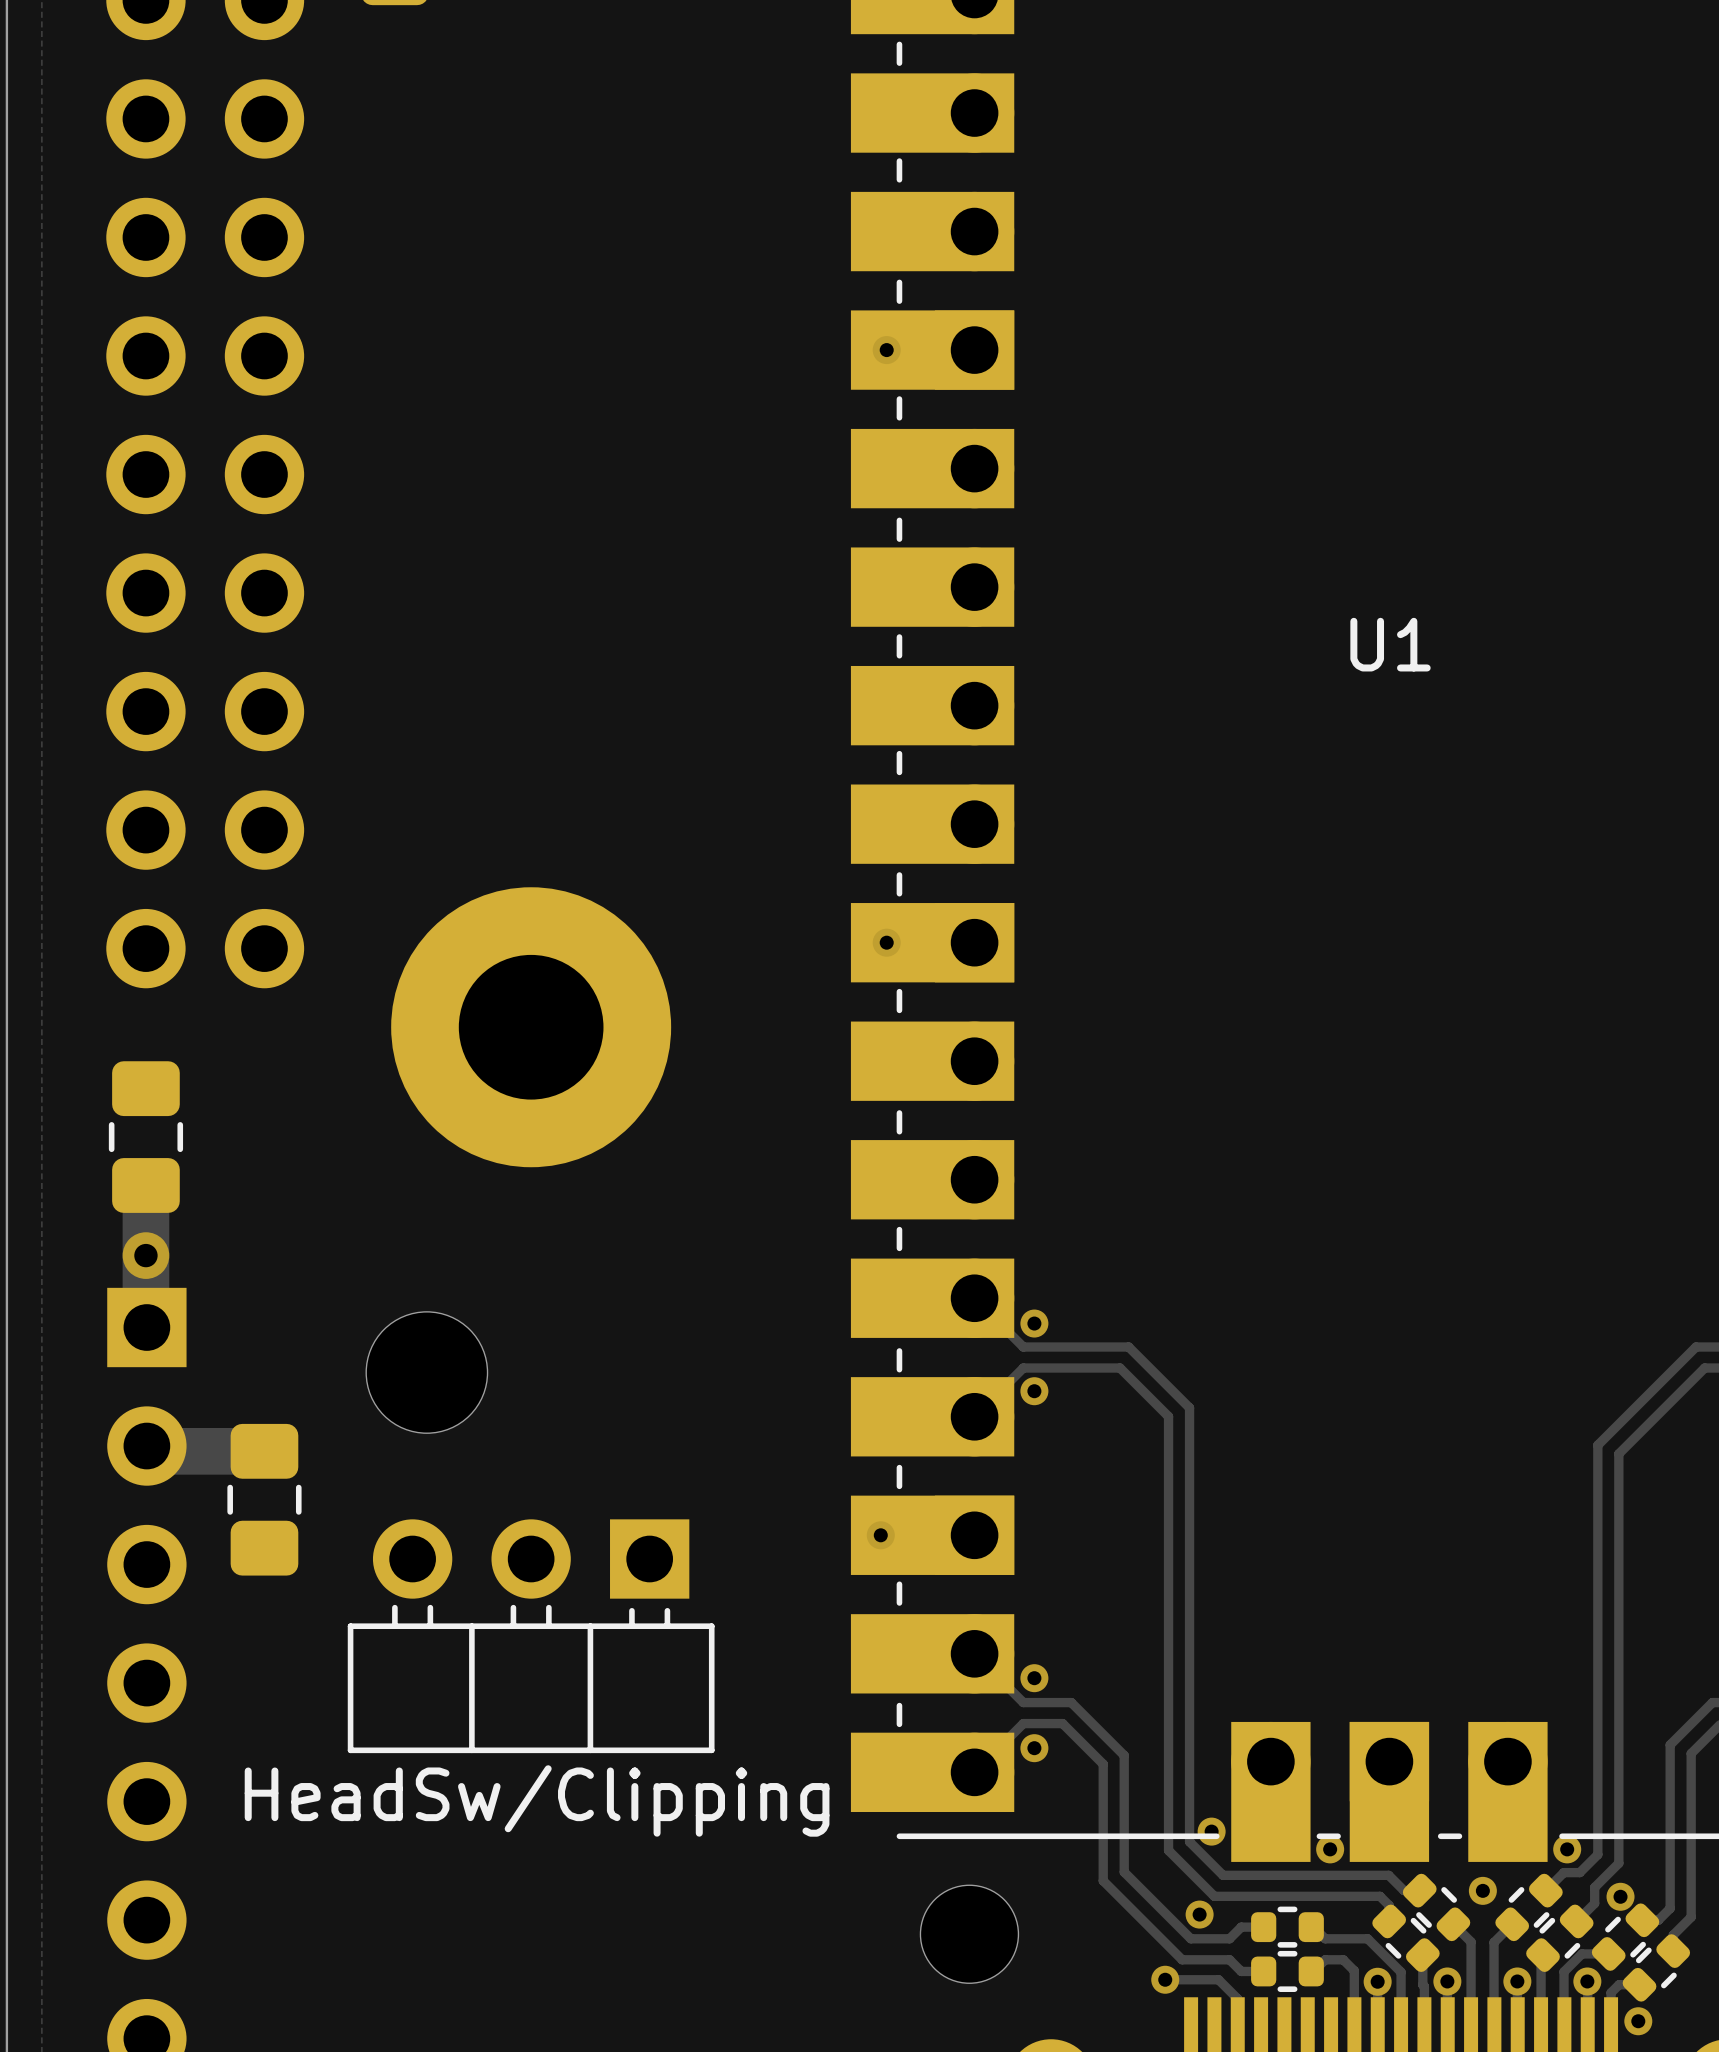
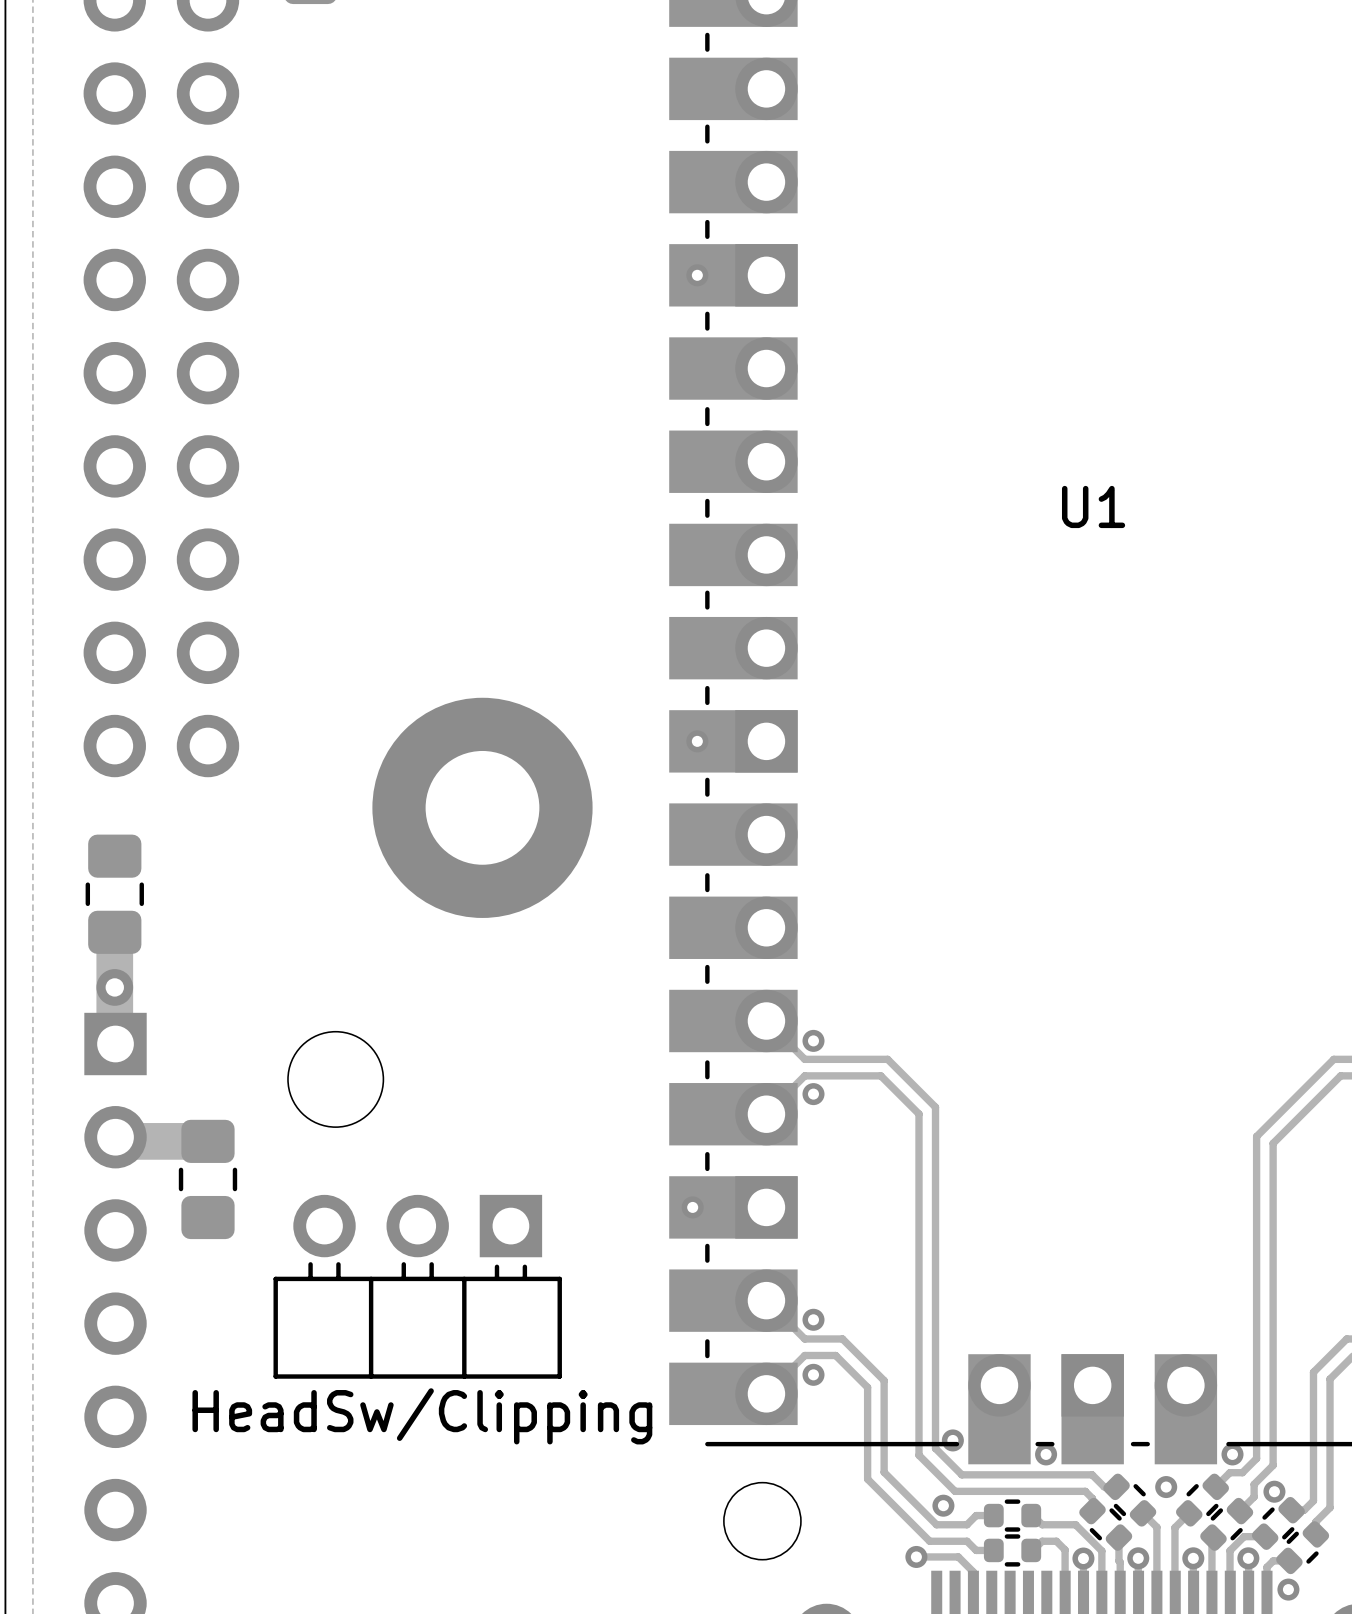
part position: (531, 1027) -> (482, 807)

